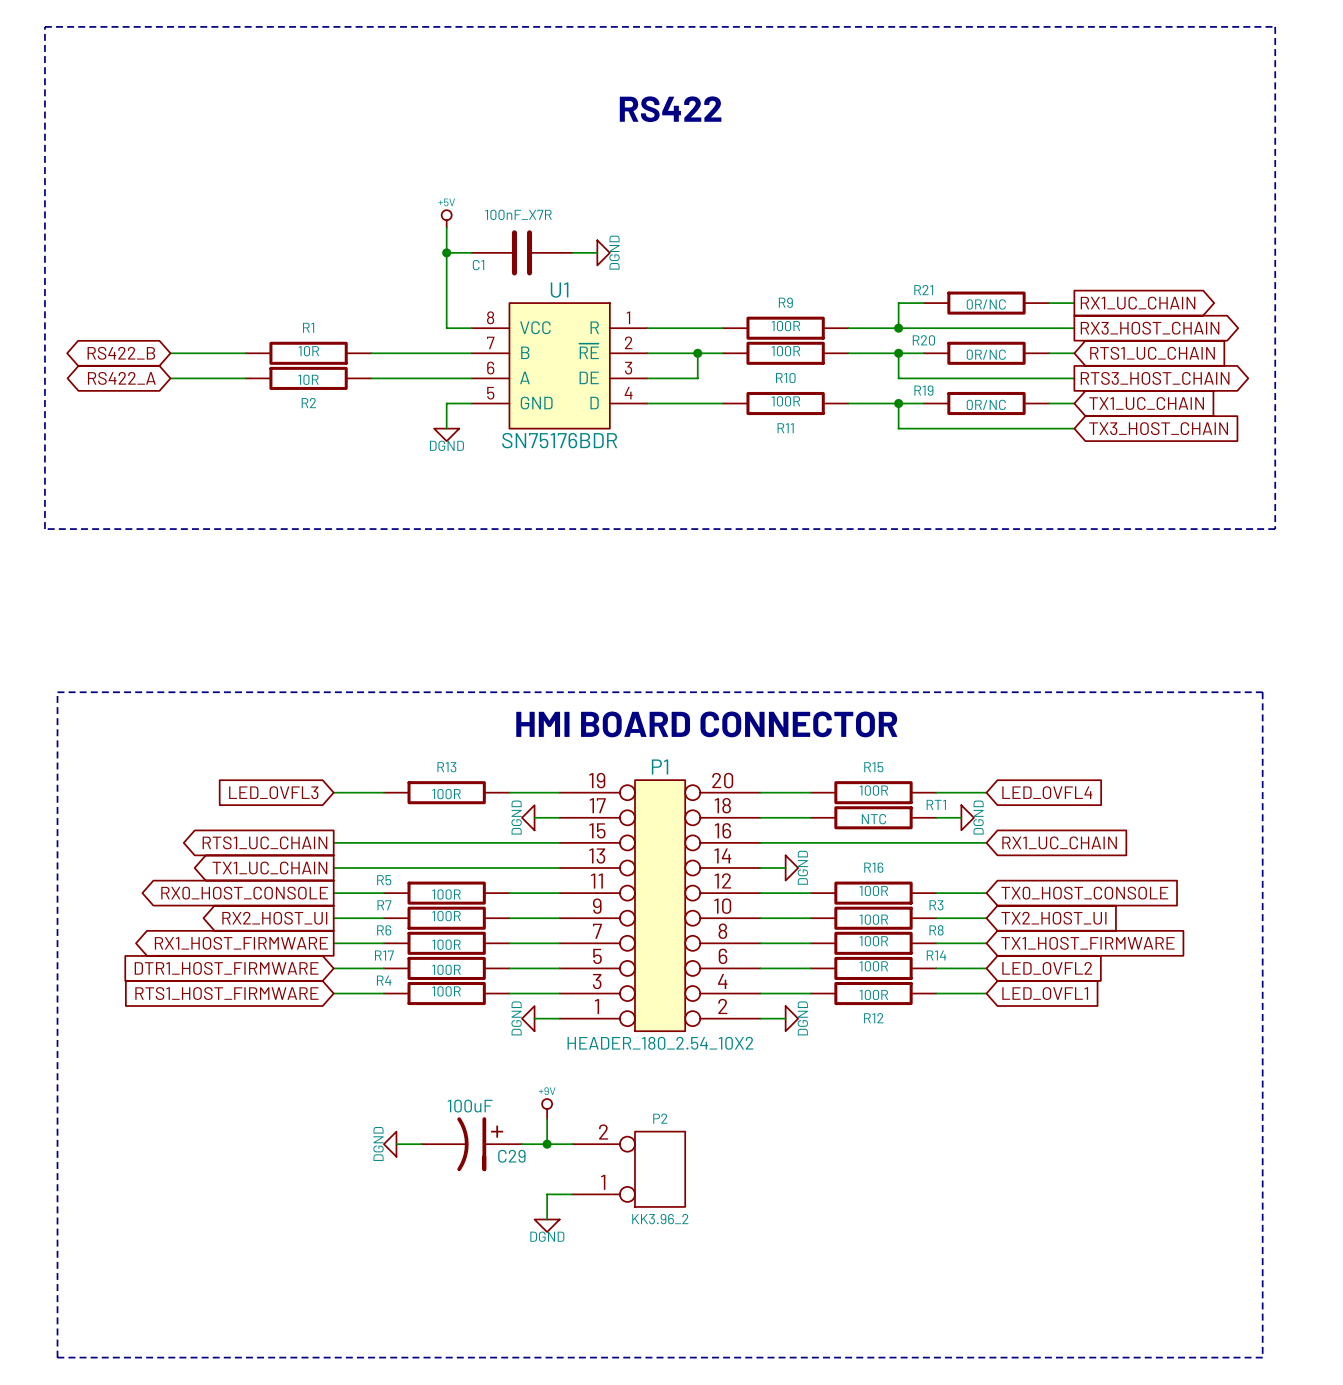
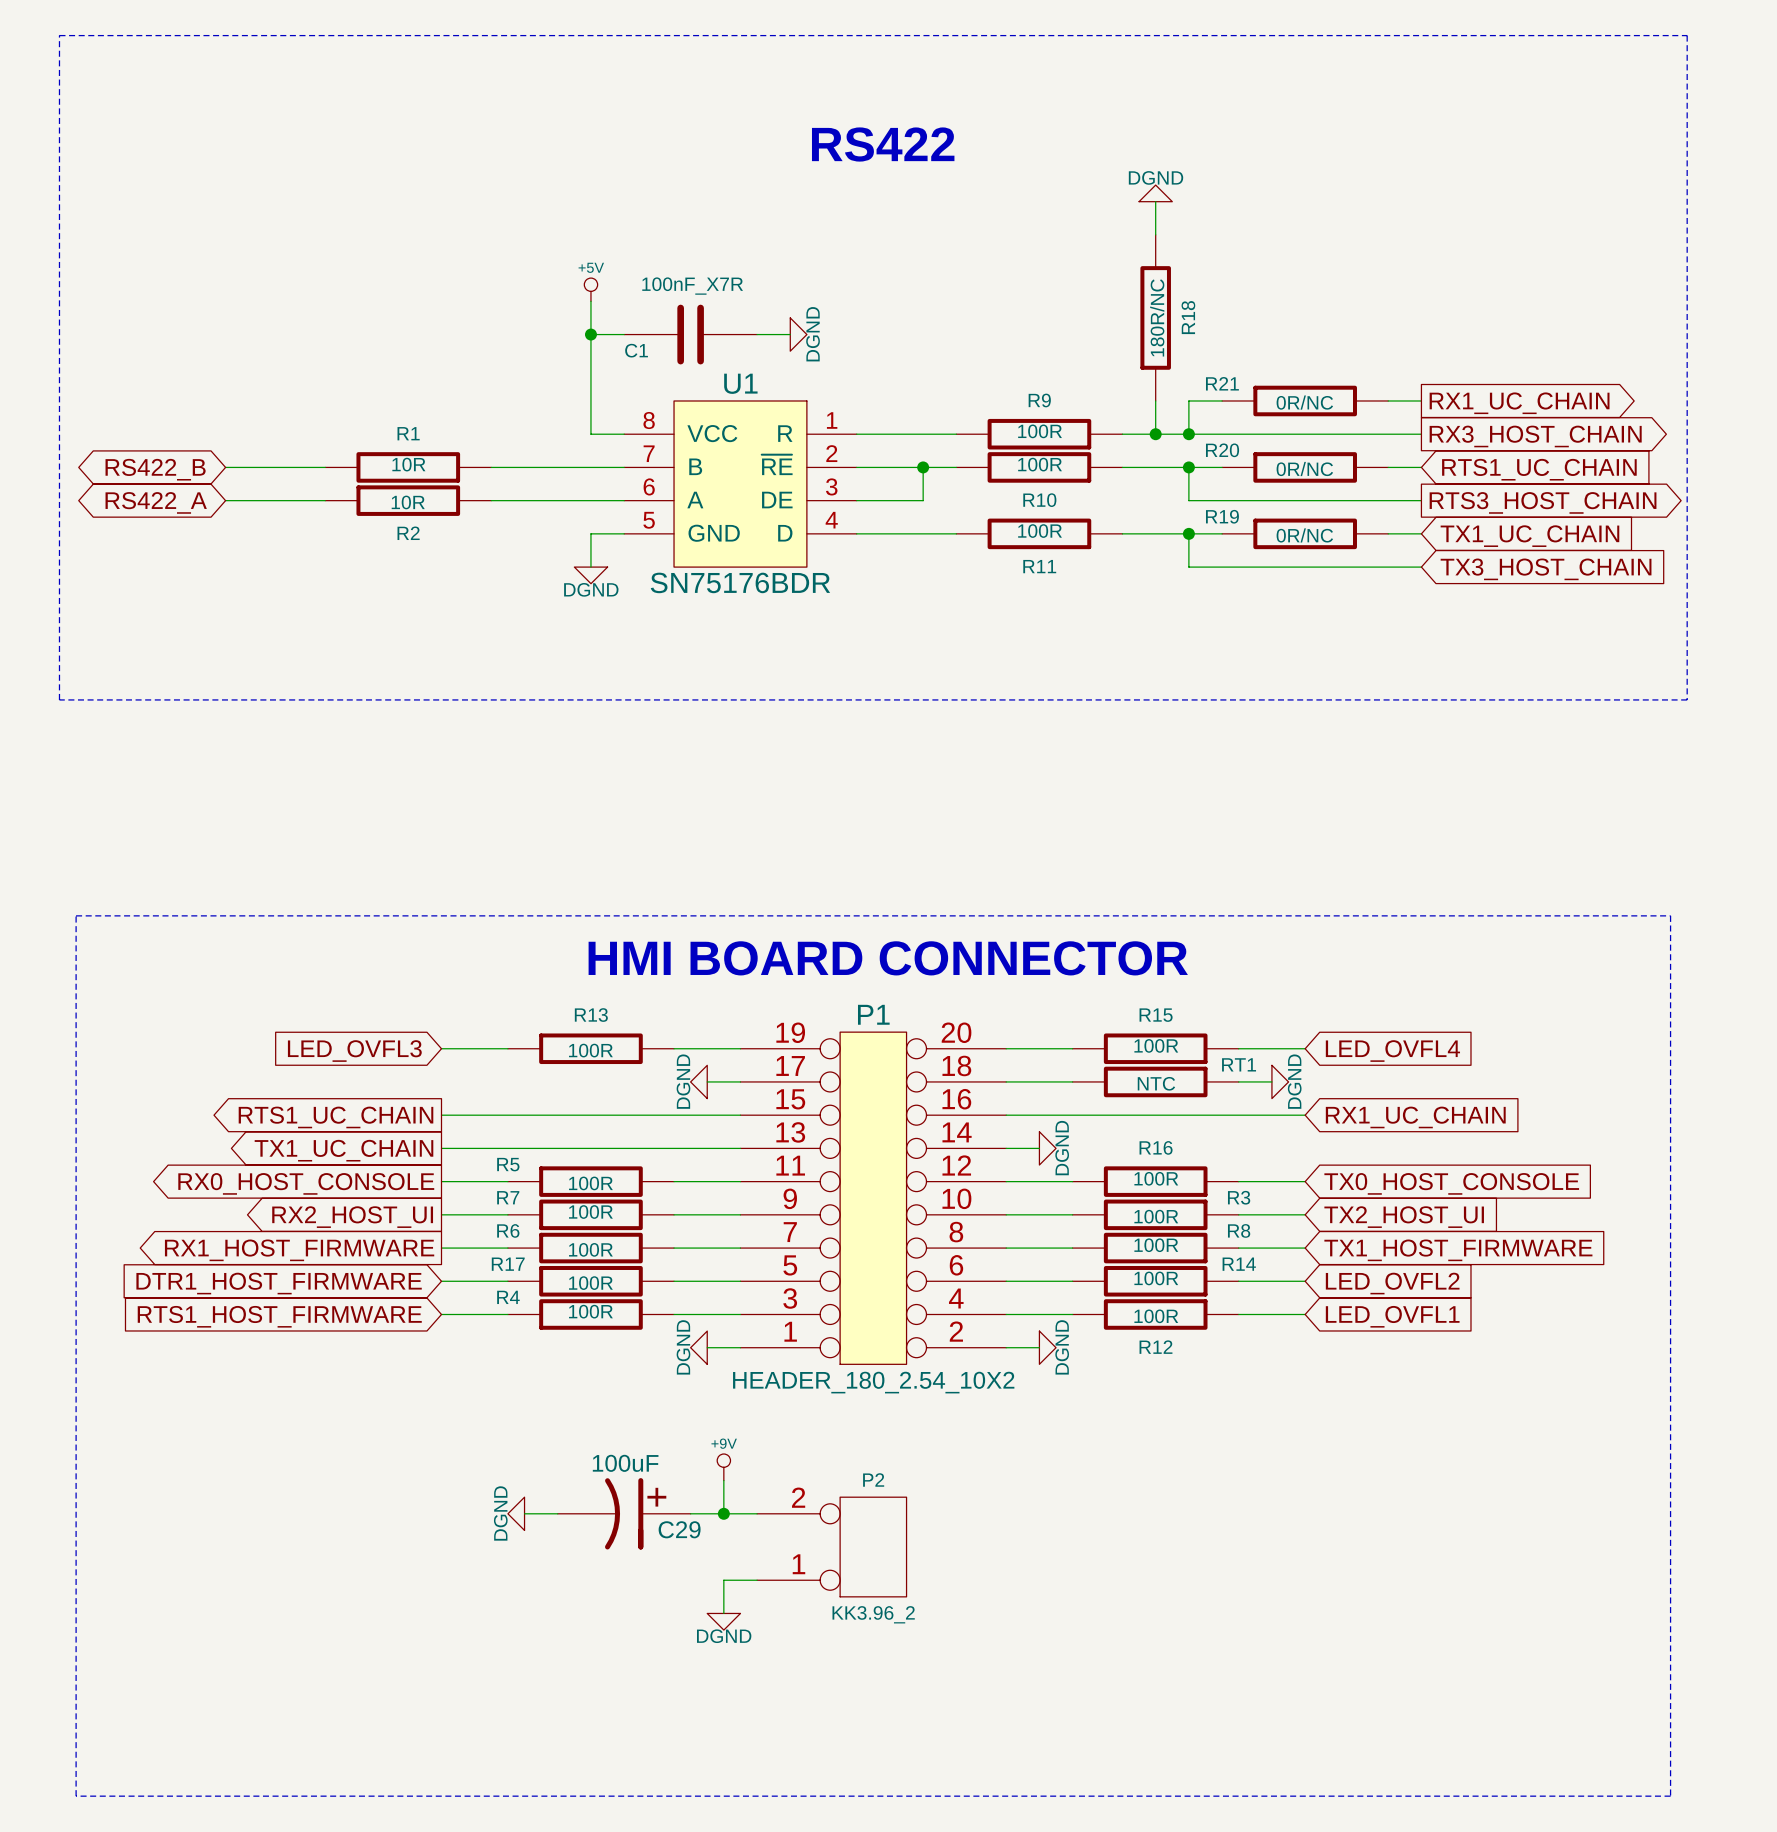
power symbol: none -> DGND (1155, 193)
wire: none -> (1155, 201) (1155, 234)
R18: none -> 180R/NC (1155, 317)
wire: none -> (1155, 400) (1155, 434)
junction: none -> (1155, 434)

